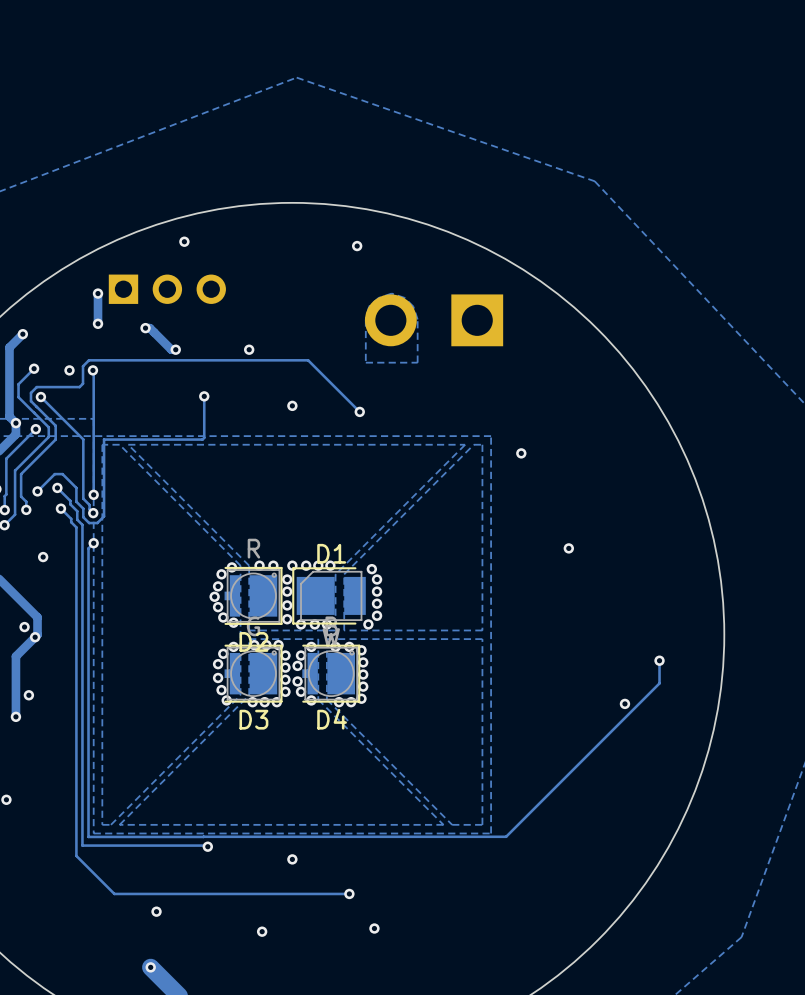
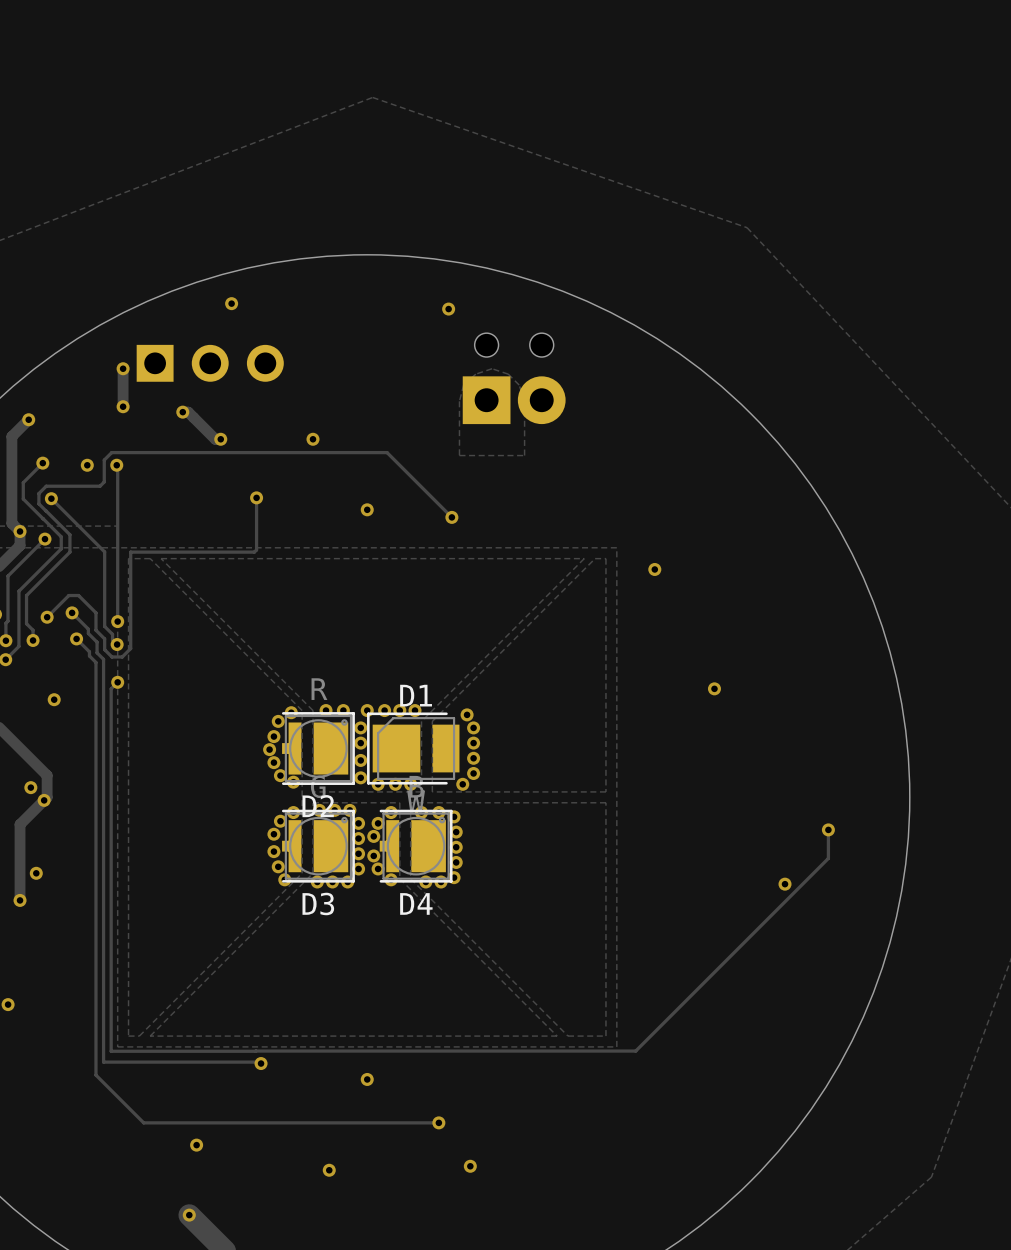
part: none -> (514, 378)
part: (434, 320) -> none

